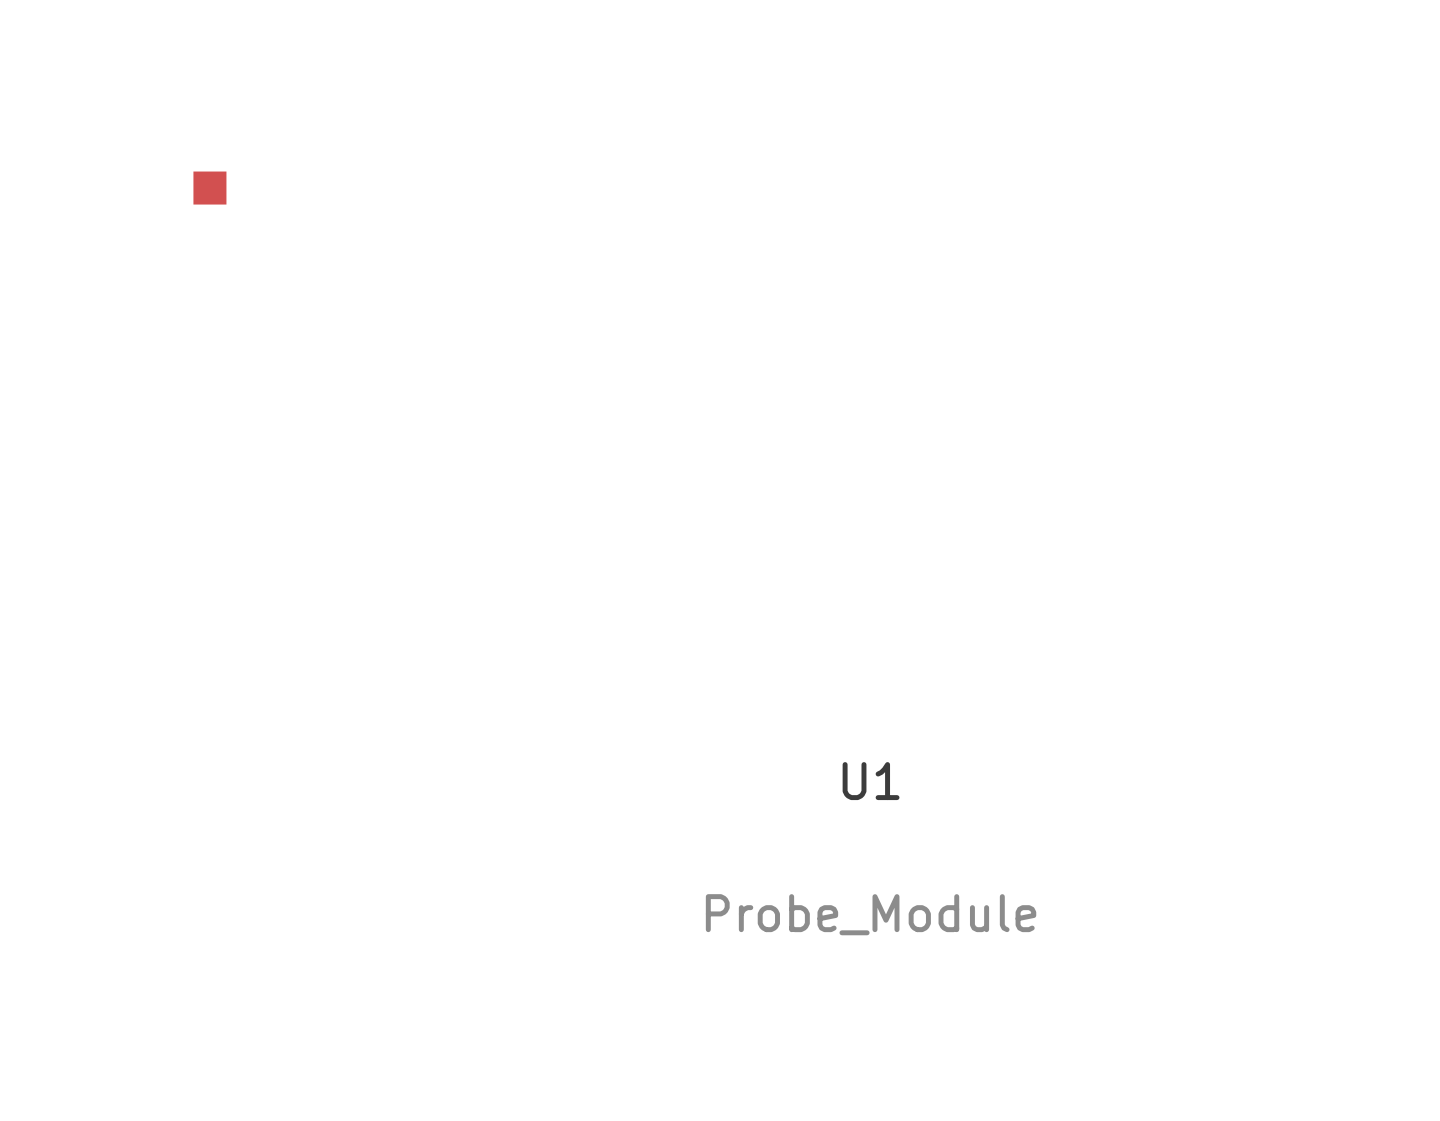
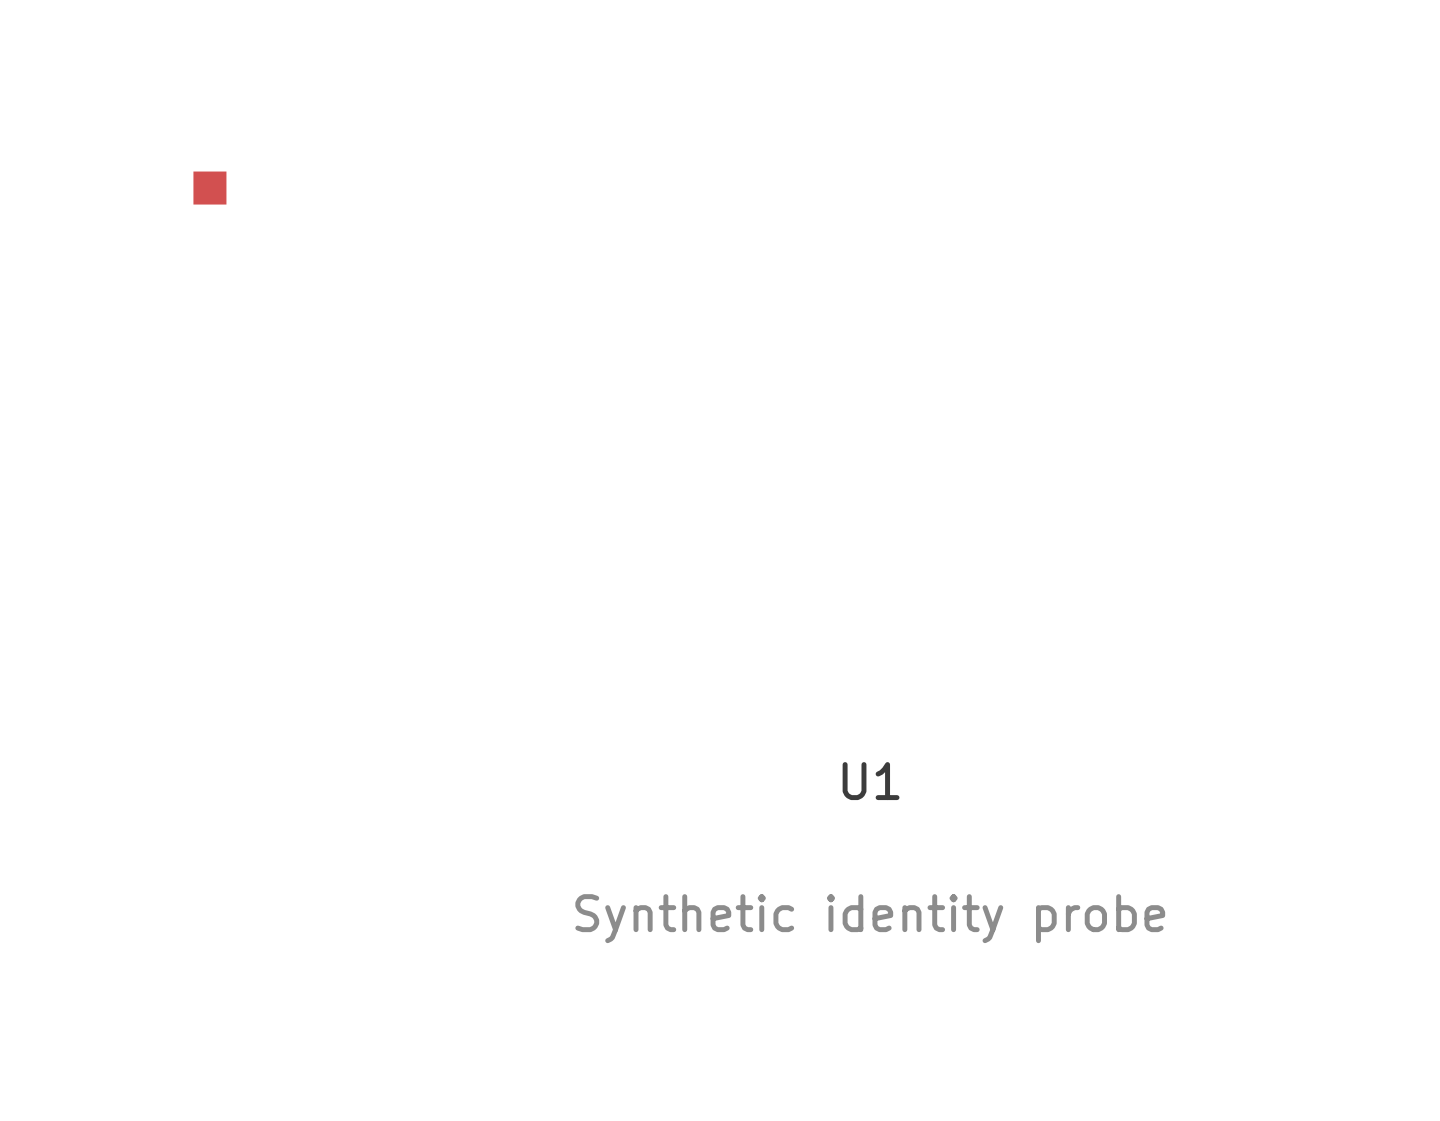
U1 value: Probe_Module (871, 914) -> Synthetic identity probe (870, 918)

